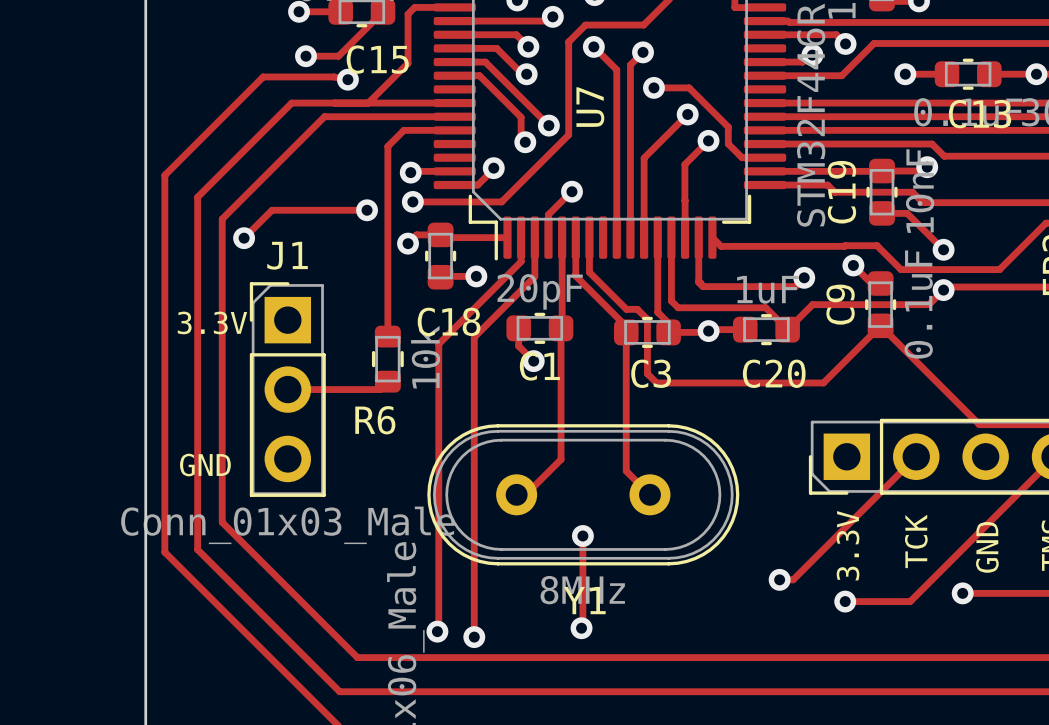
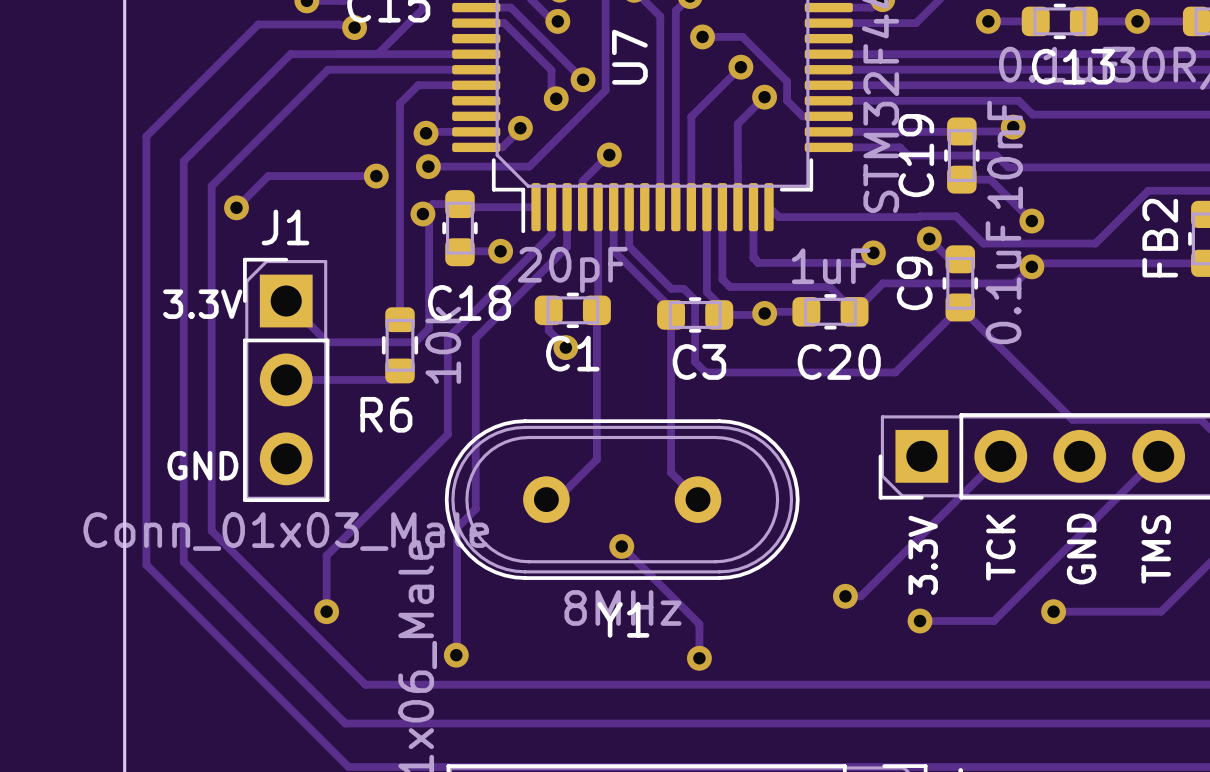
track: none -> (429, 220) (429, 328) (415, 342) (327, 342) (286, 301)
track: (534, 272) (534, 276) (474, 337) (474, 637) -> (567, 246) (475, 338) (475, 509) (457, 527) (457, 648)
track: (438, 344) (437, 631) -> (457, 328) (447, 338) (447, 434) (326, 555) (326, 611)
track: (582, 536) (581, 628) -> (621, 546) (699, 624) (699, 658)
via: none -> (326, 611)
via position: (581, 628) -> (699, 658)
via: (474, 637) -> none

